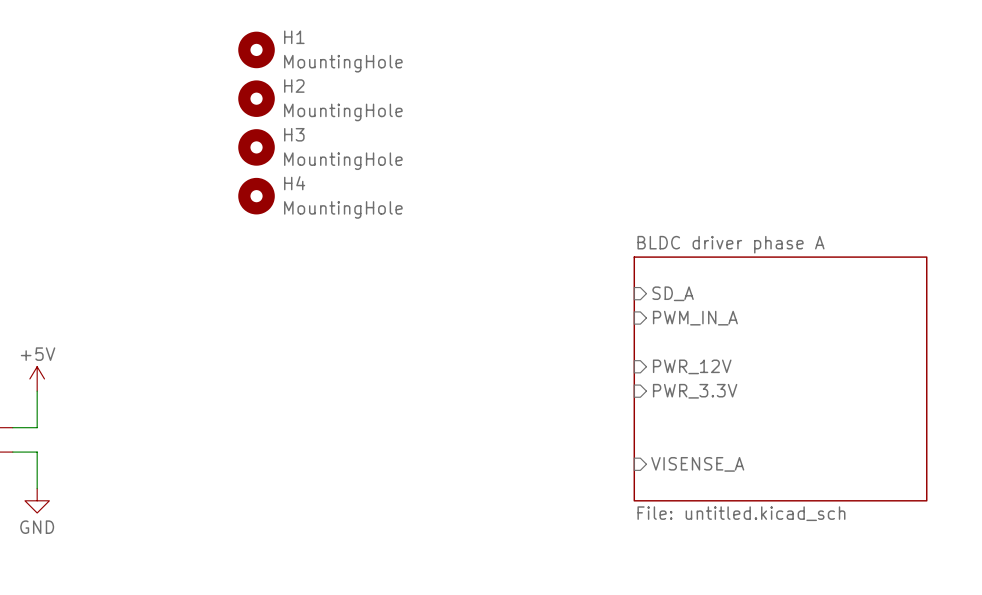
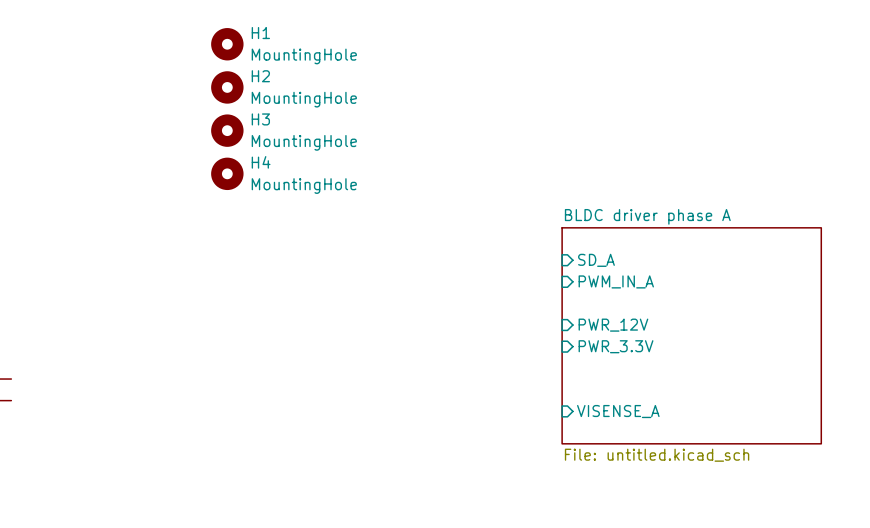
power symbol: +5V (37, 378) -> none
wire: (37, 391) (37, 427) (12, 427) -> none
wire: (12, 452) (37, 452) (37, 488) -> none
power symbol: GND (37, 500) -> none

